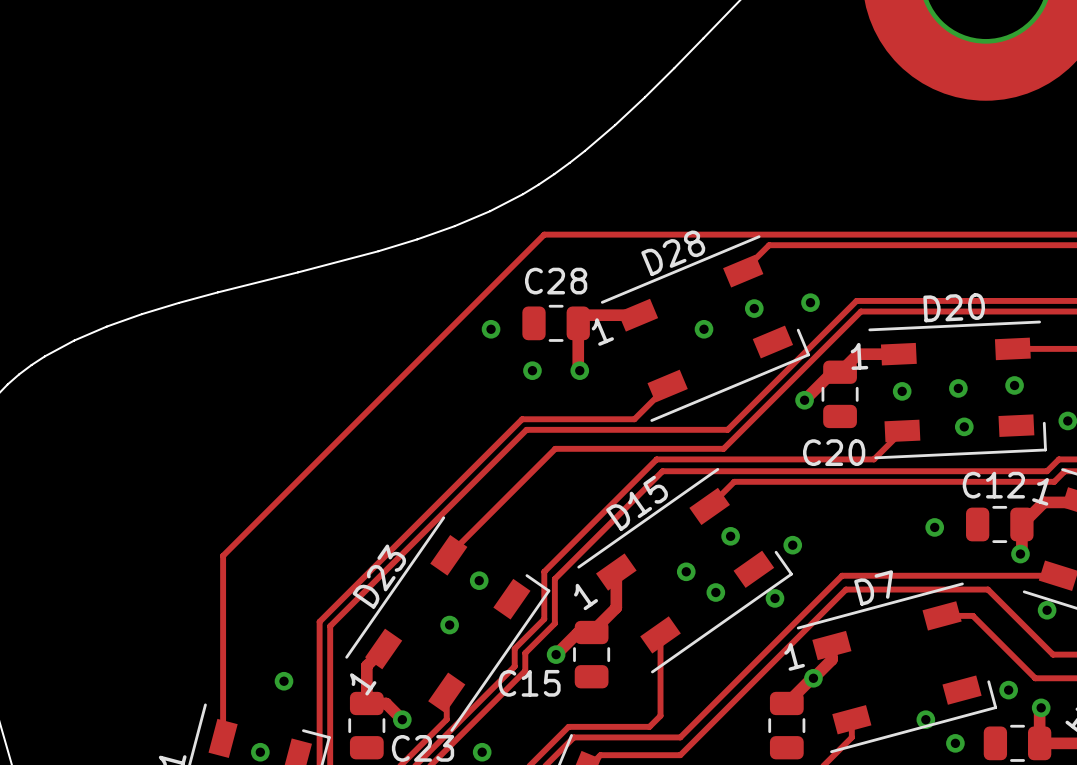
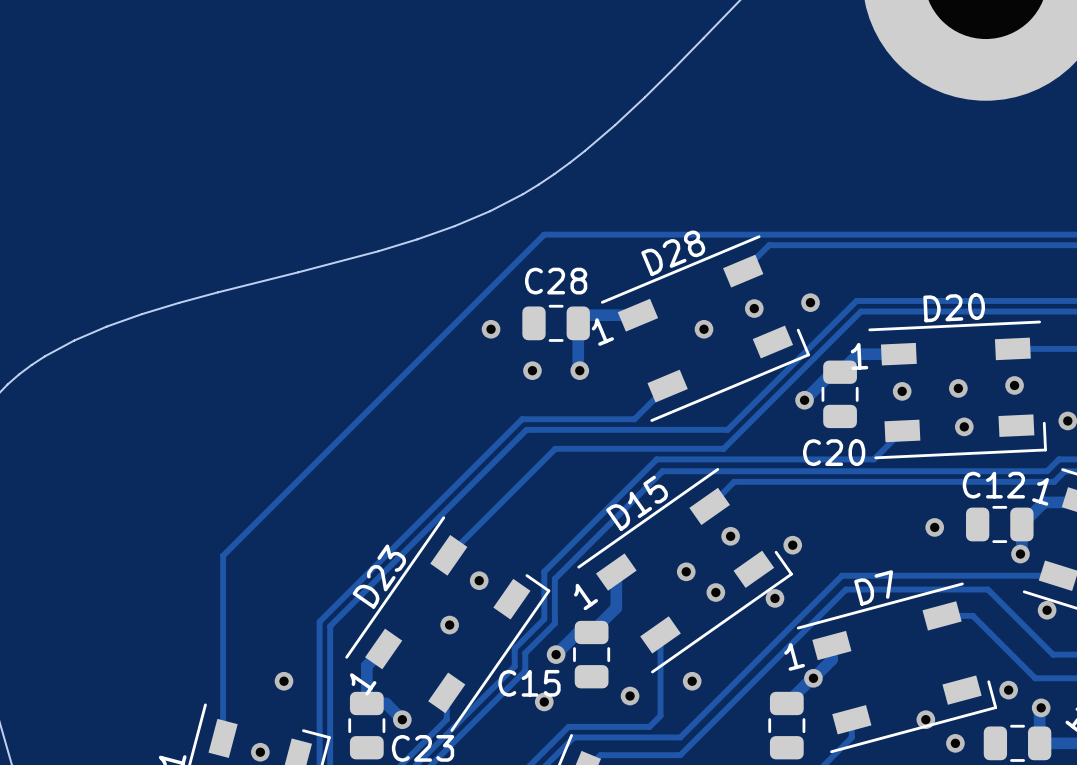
via: none -> (692, 681)
via: none -> (630, 696)
via: none -> (544, 701)
via: (482, 752) -> none

